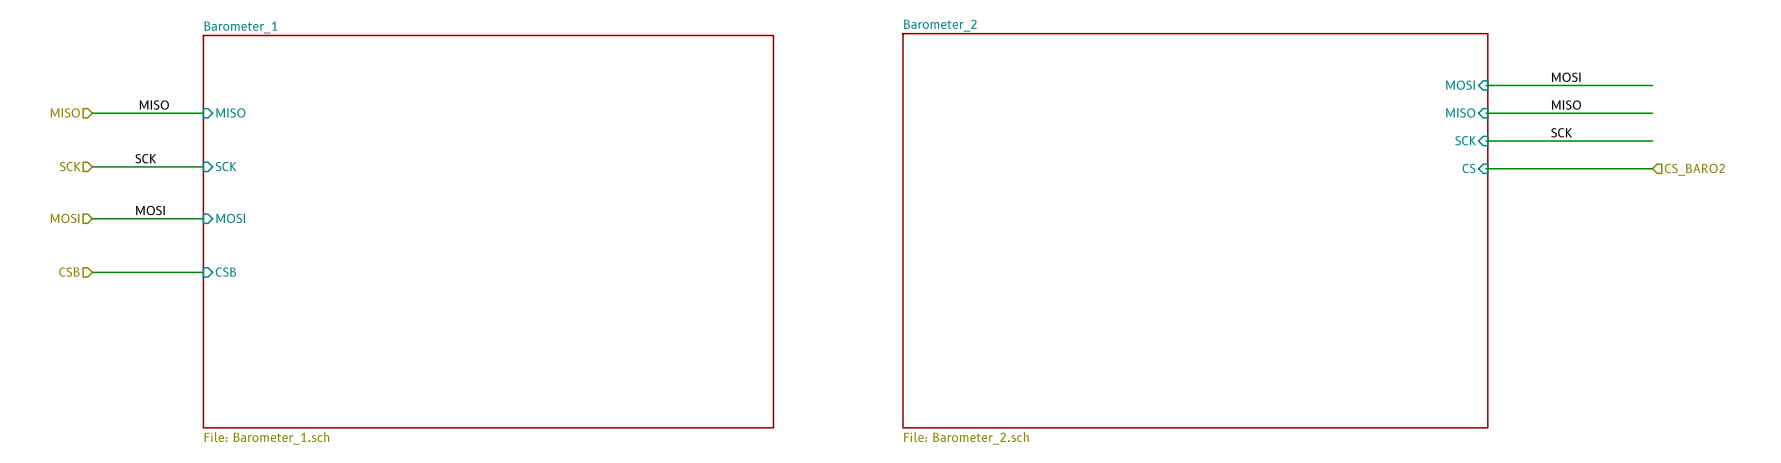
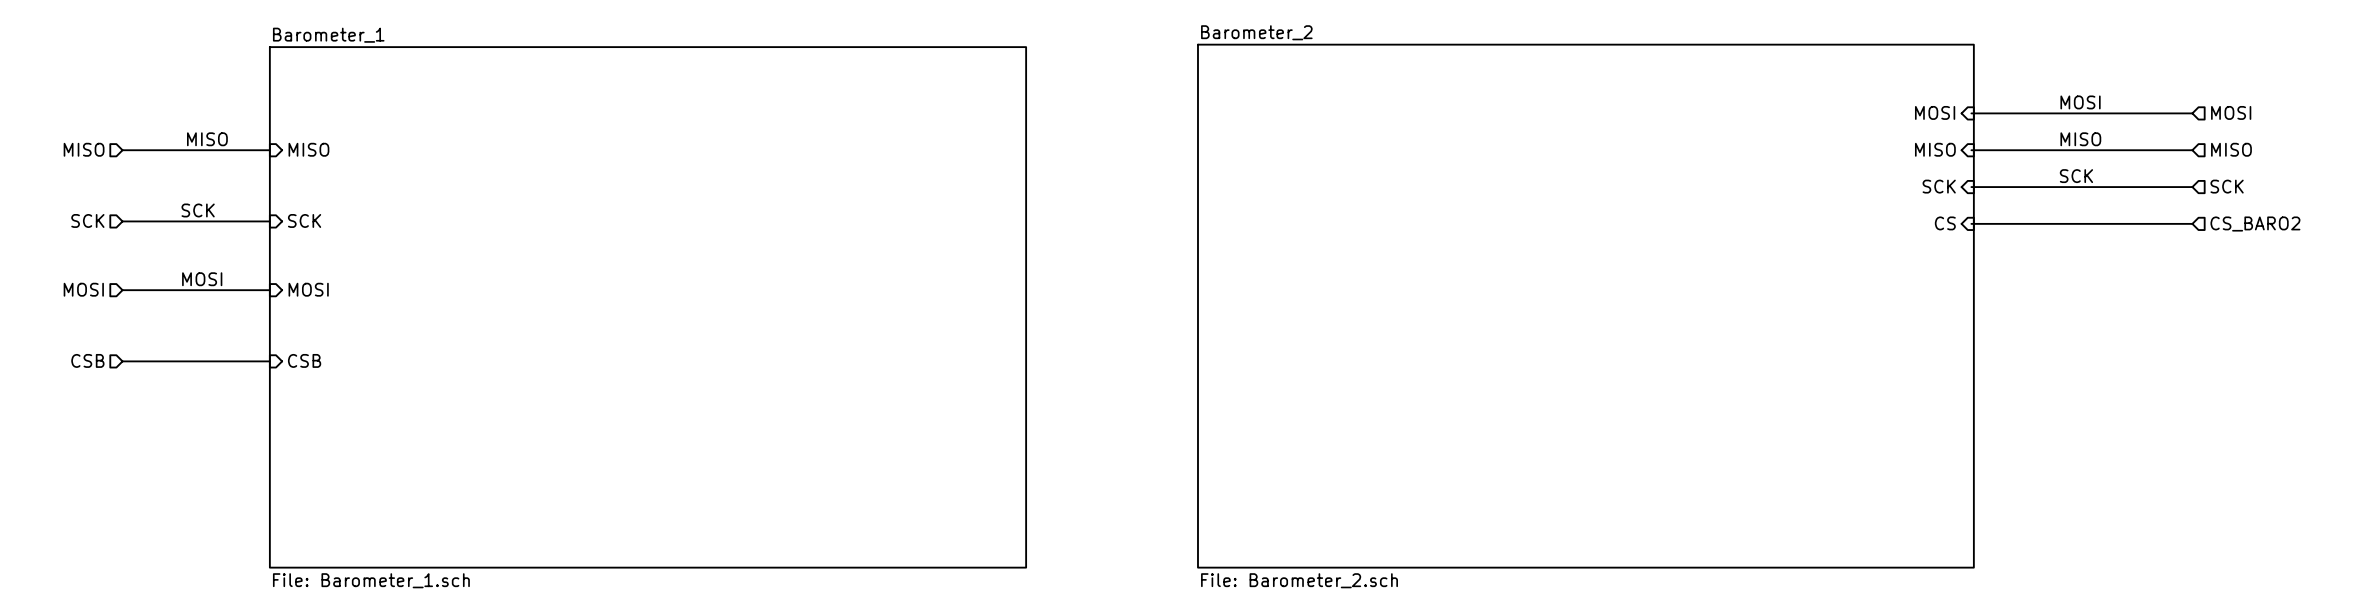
hierarchical label: none -> MOSI (2231, 112)
hierarchical label: none -> MISO (2231, 149)
hierarchical label: none -> SCK (2227, 186)

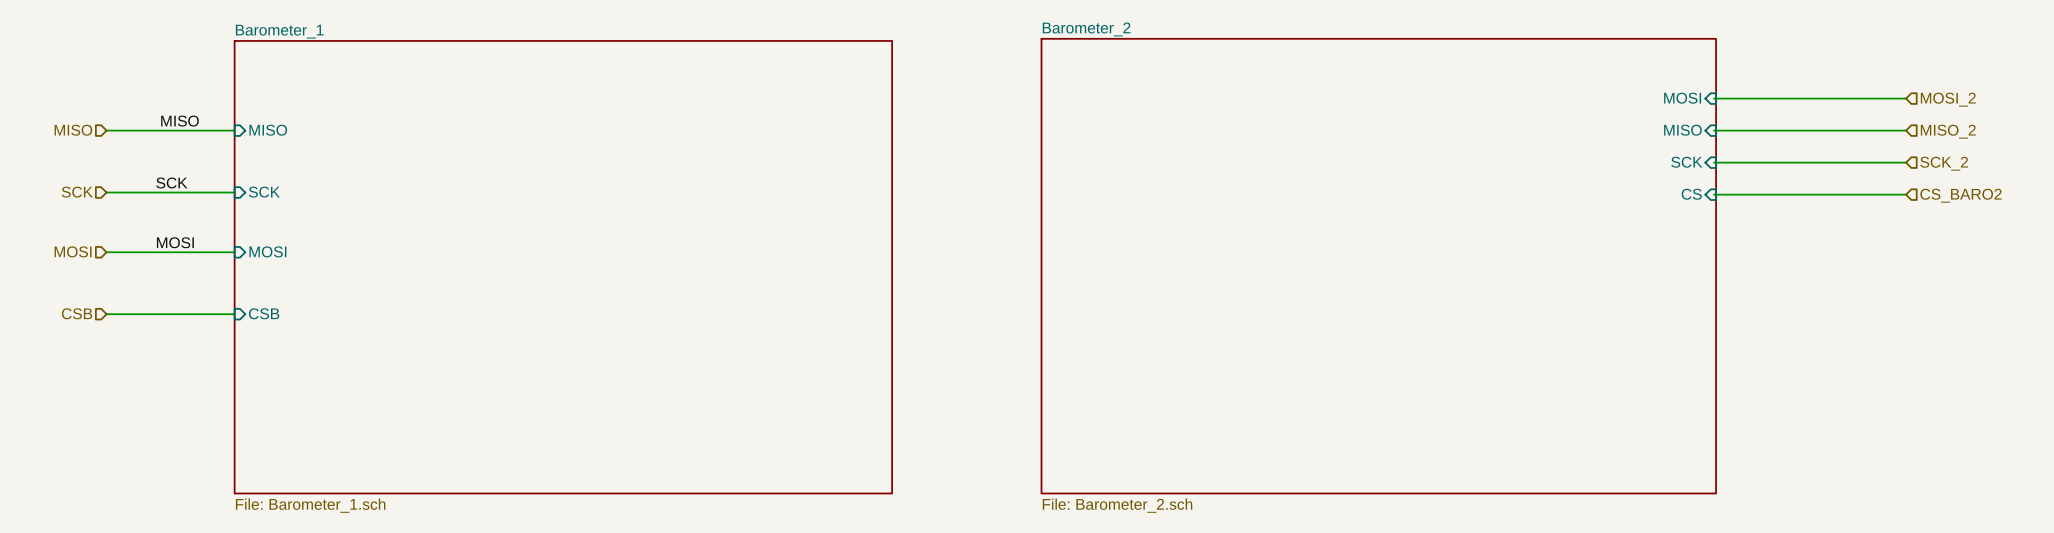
label: MOSI (2080, 102) -> none
hierarchical label: MOSI (2231, 112) -> MOSI_2 (1948, 99)
label: MISO (2080, 139) -> none
hierarchical label: MISO (2231, 149) -> MISO_2 (1948, 131)
label: SCK (2076, 176) -> none
hierarchical label: SCK (2227, 186) -> SCK_2 (1944, 163)

